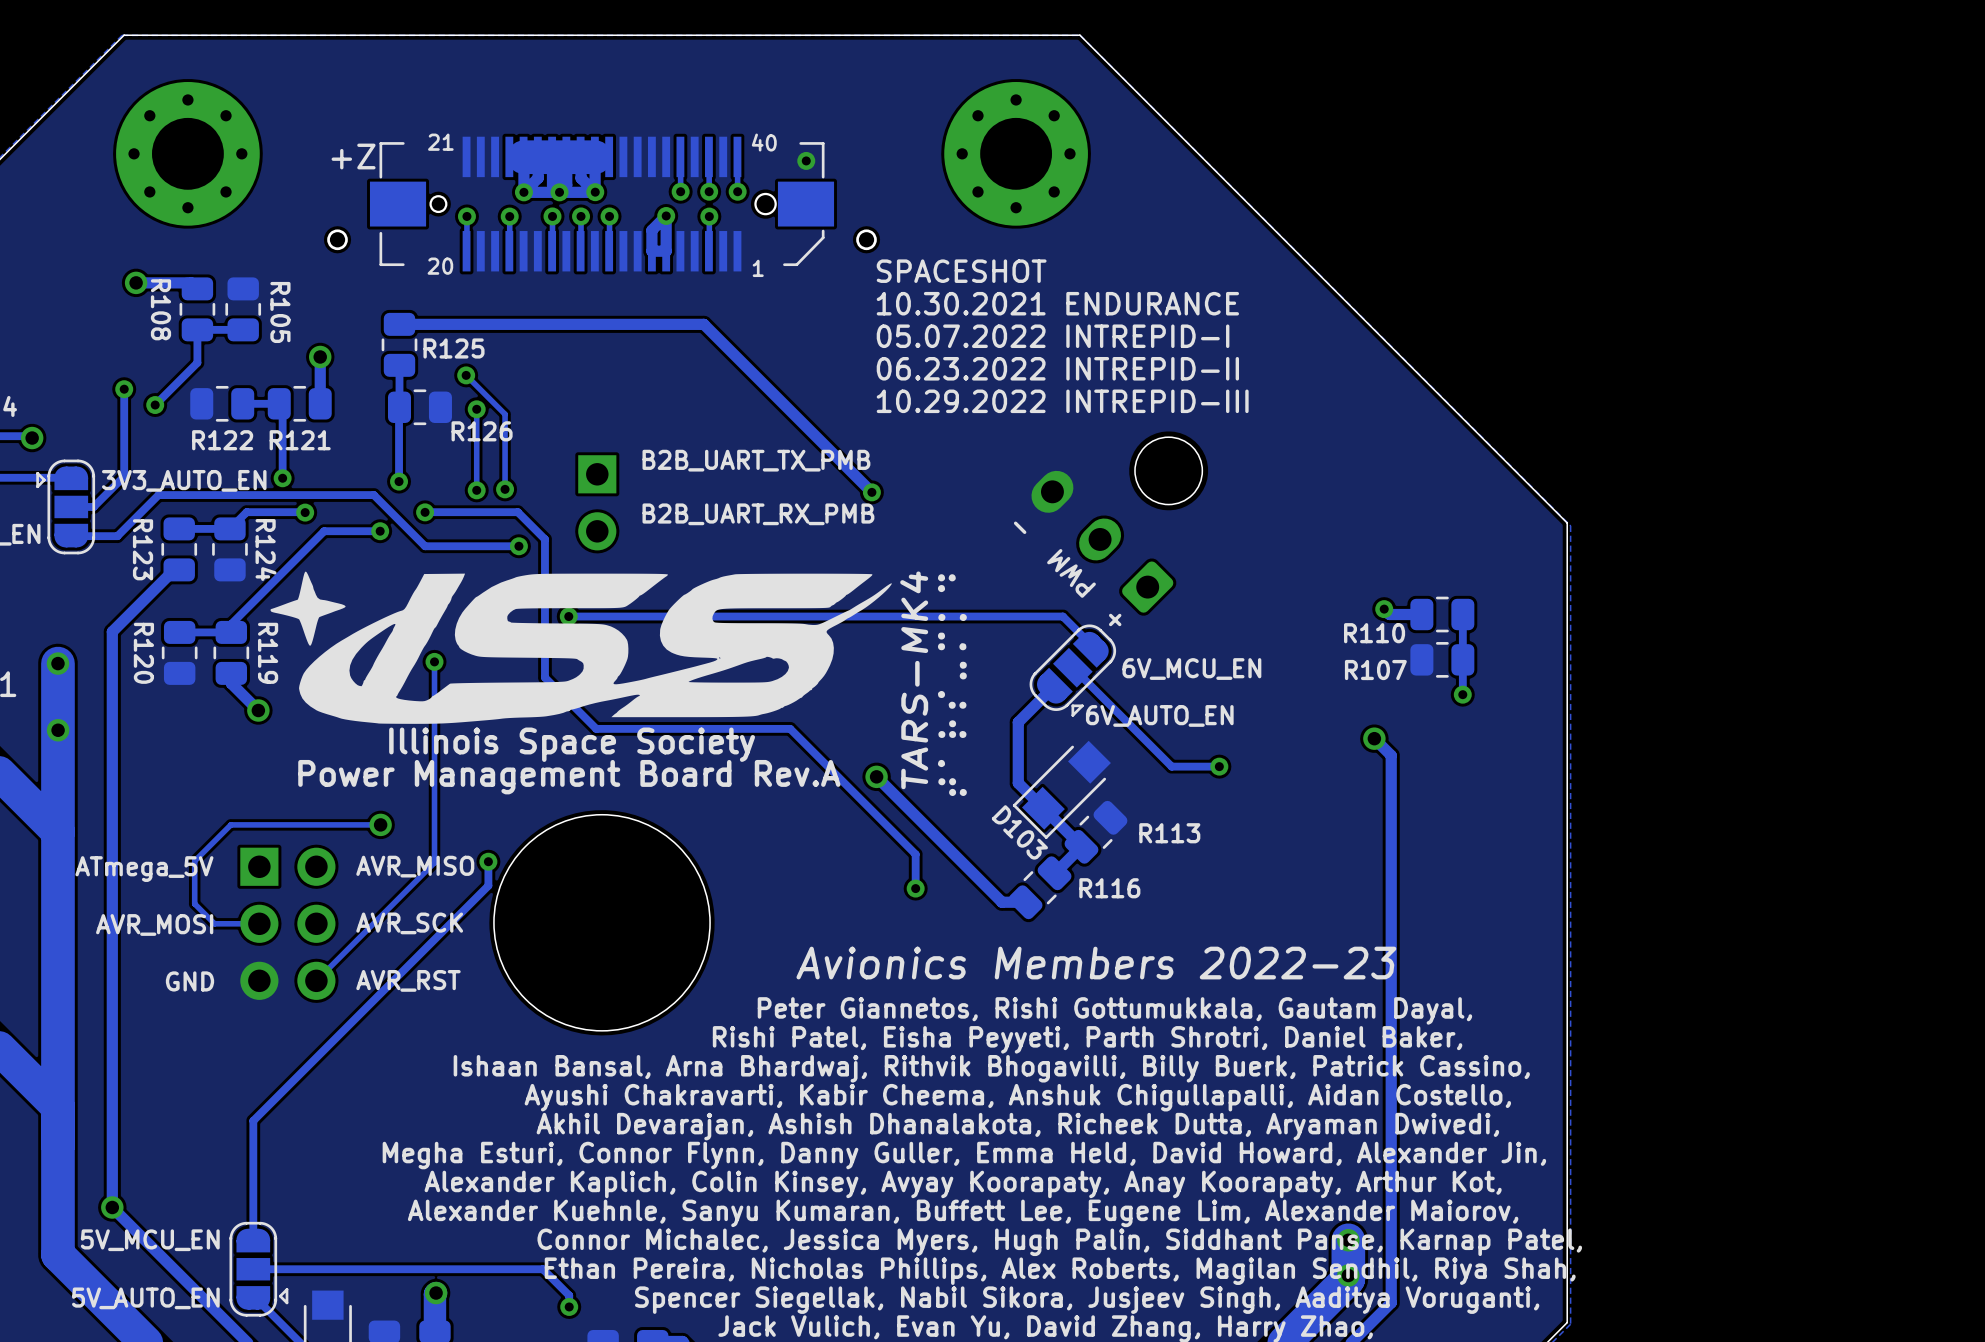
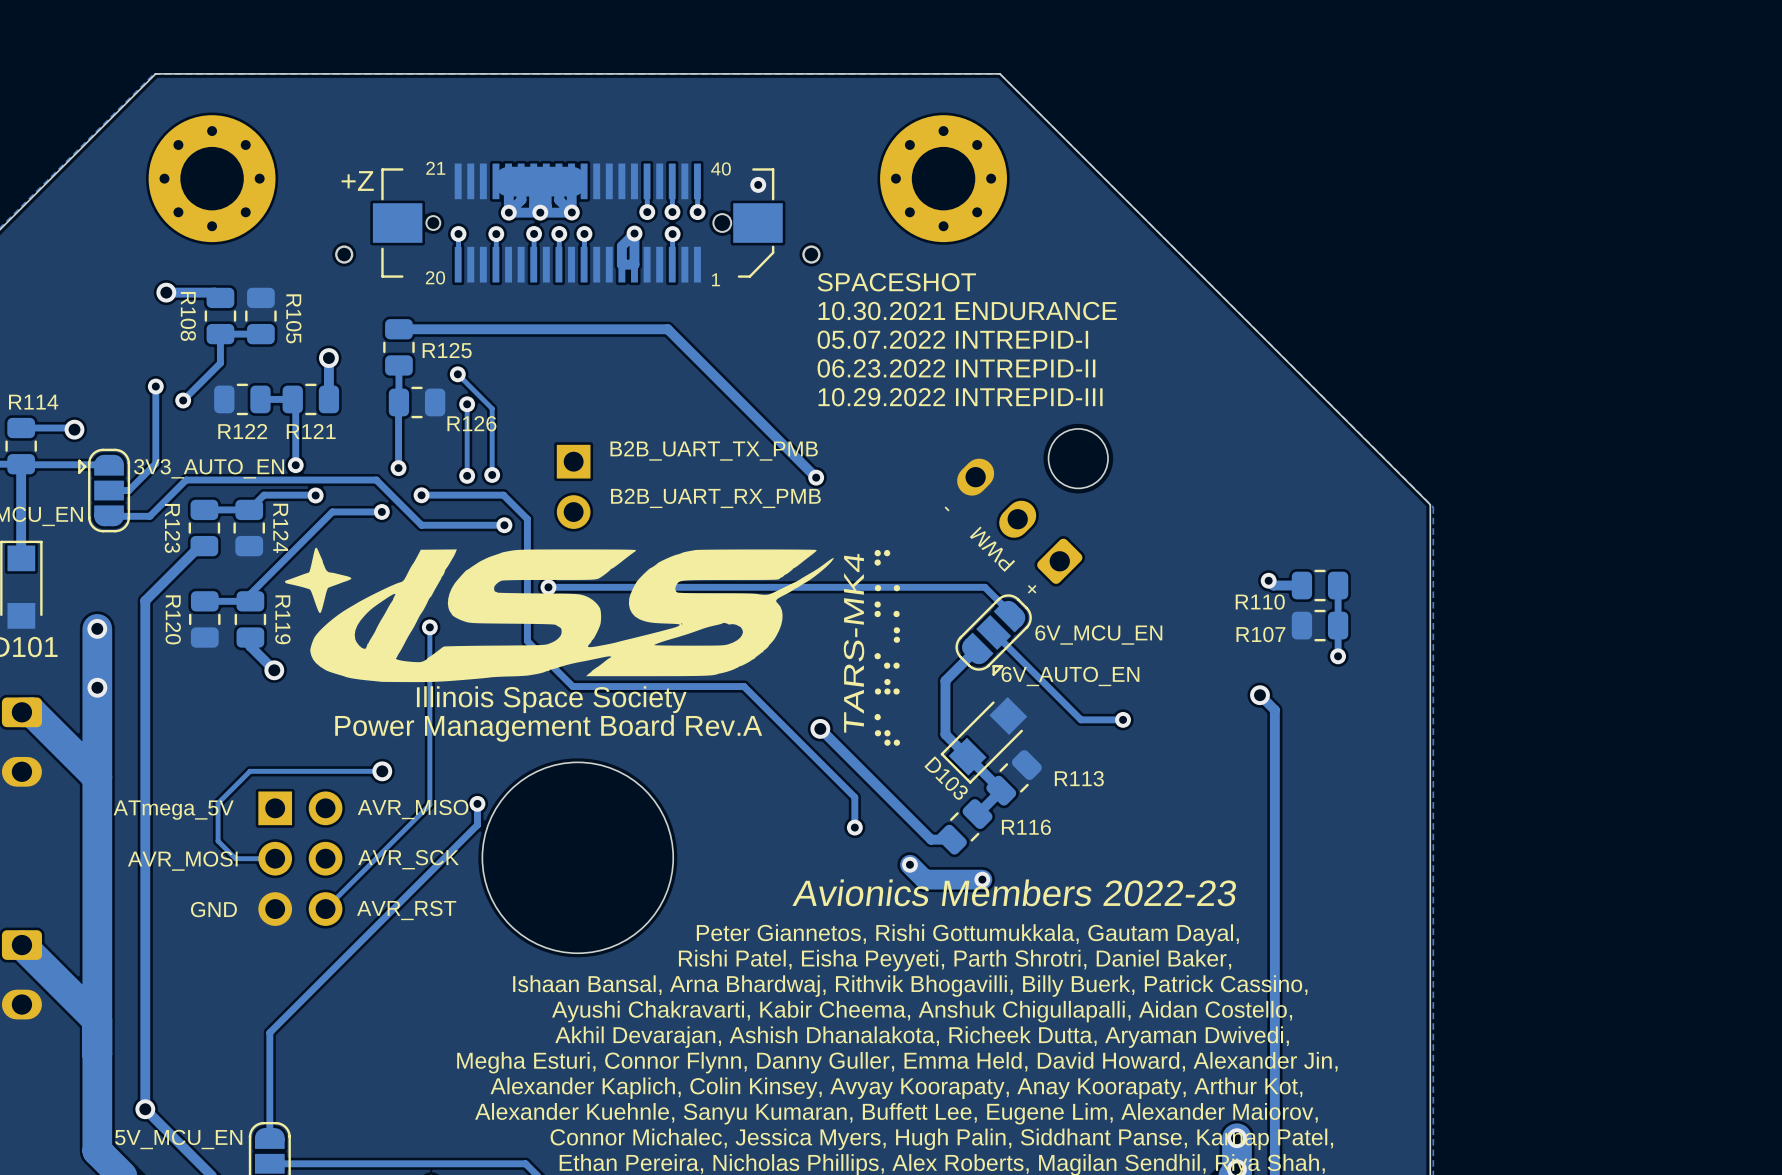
track: none -> (909, 864) (924, 879) (982, 879)
via: none -> (909, 864)
via: none -> (982, 879)

